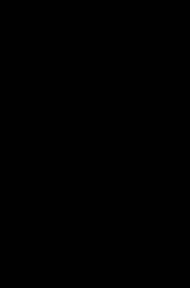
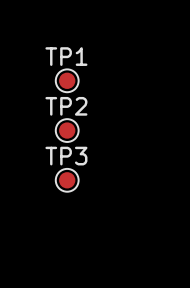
TP1: none -> (67, 80)
TP2: none -> (67, 130)
TP3: none -> (67, 180)

